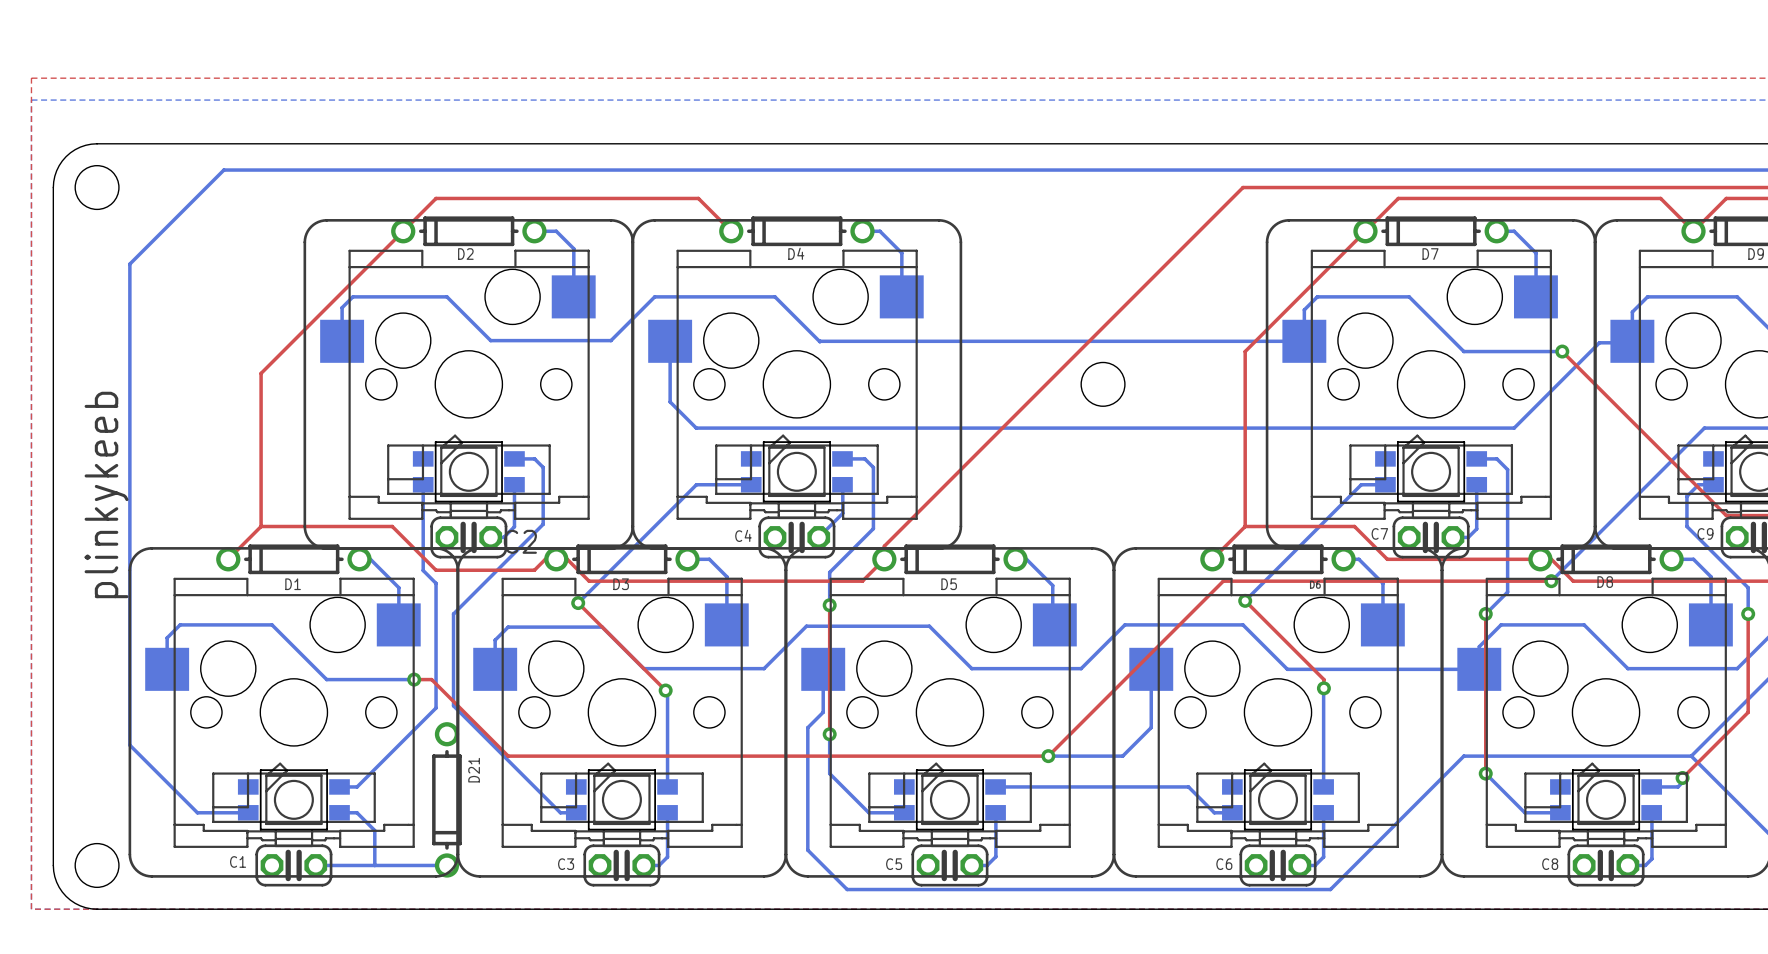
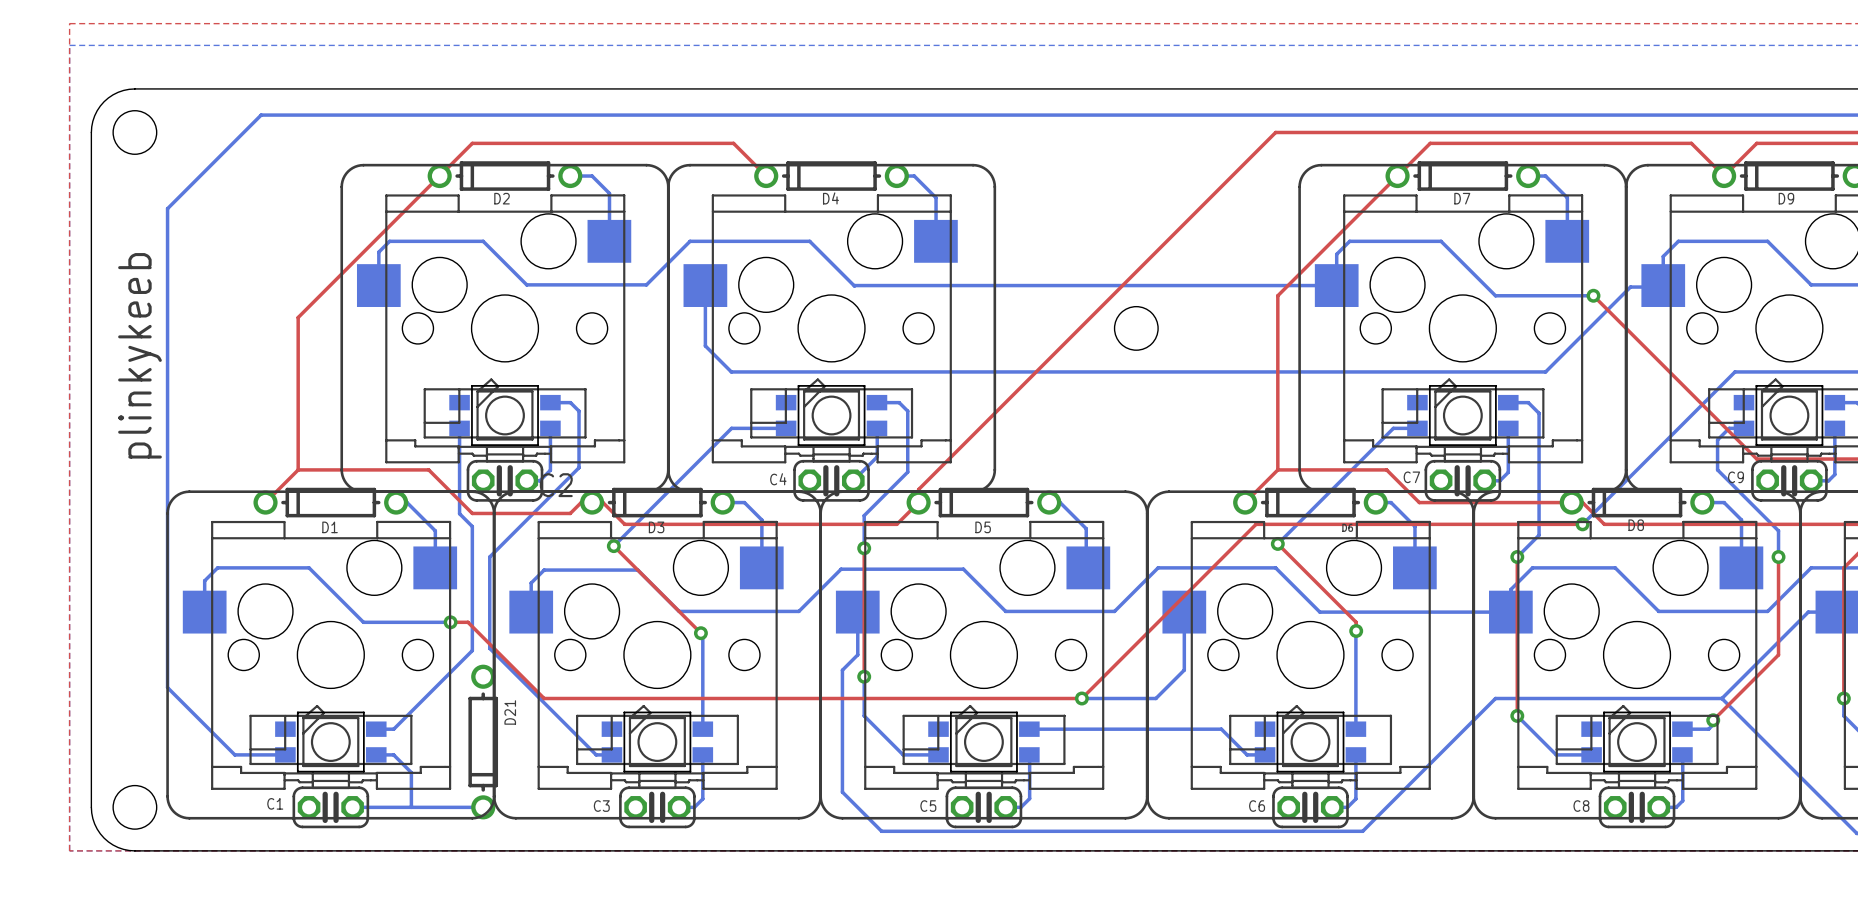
text position: plinkykeeb (106, 494) -> plinkykeeb (139, 355)

